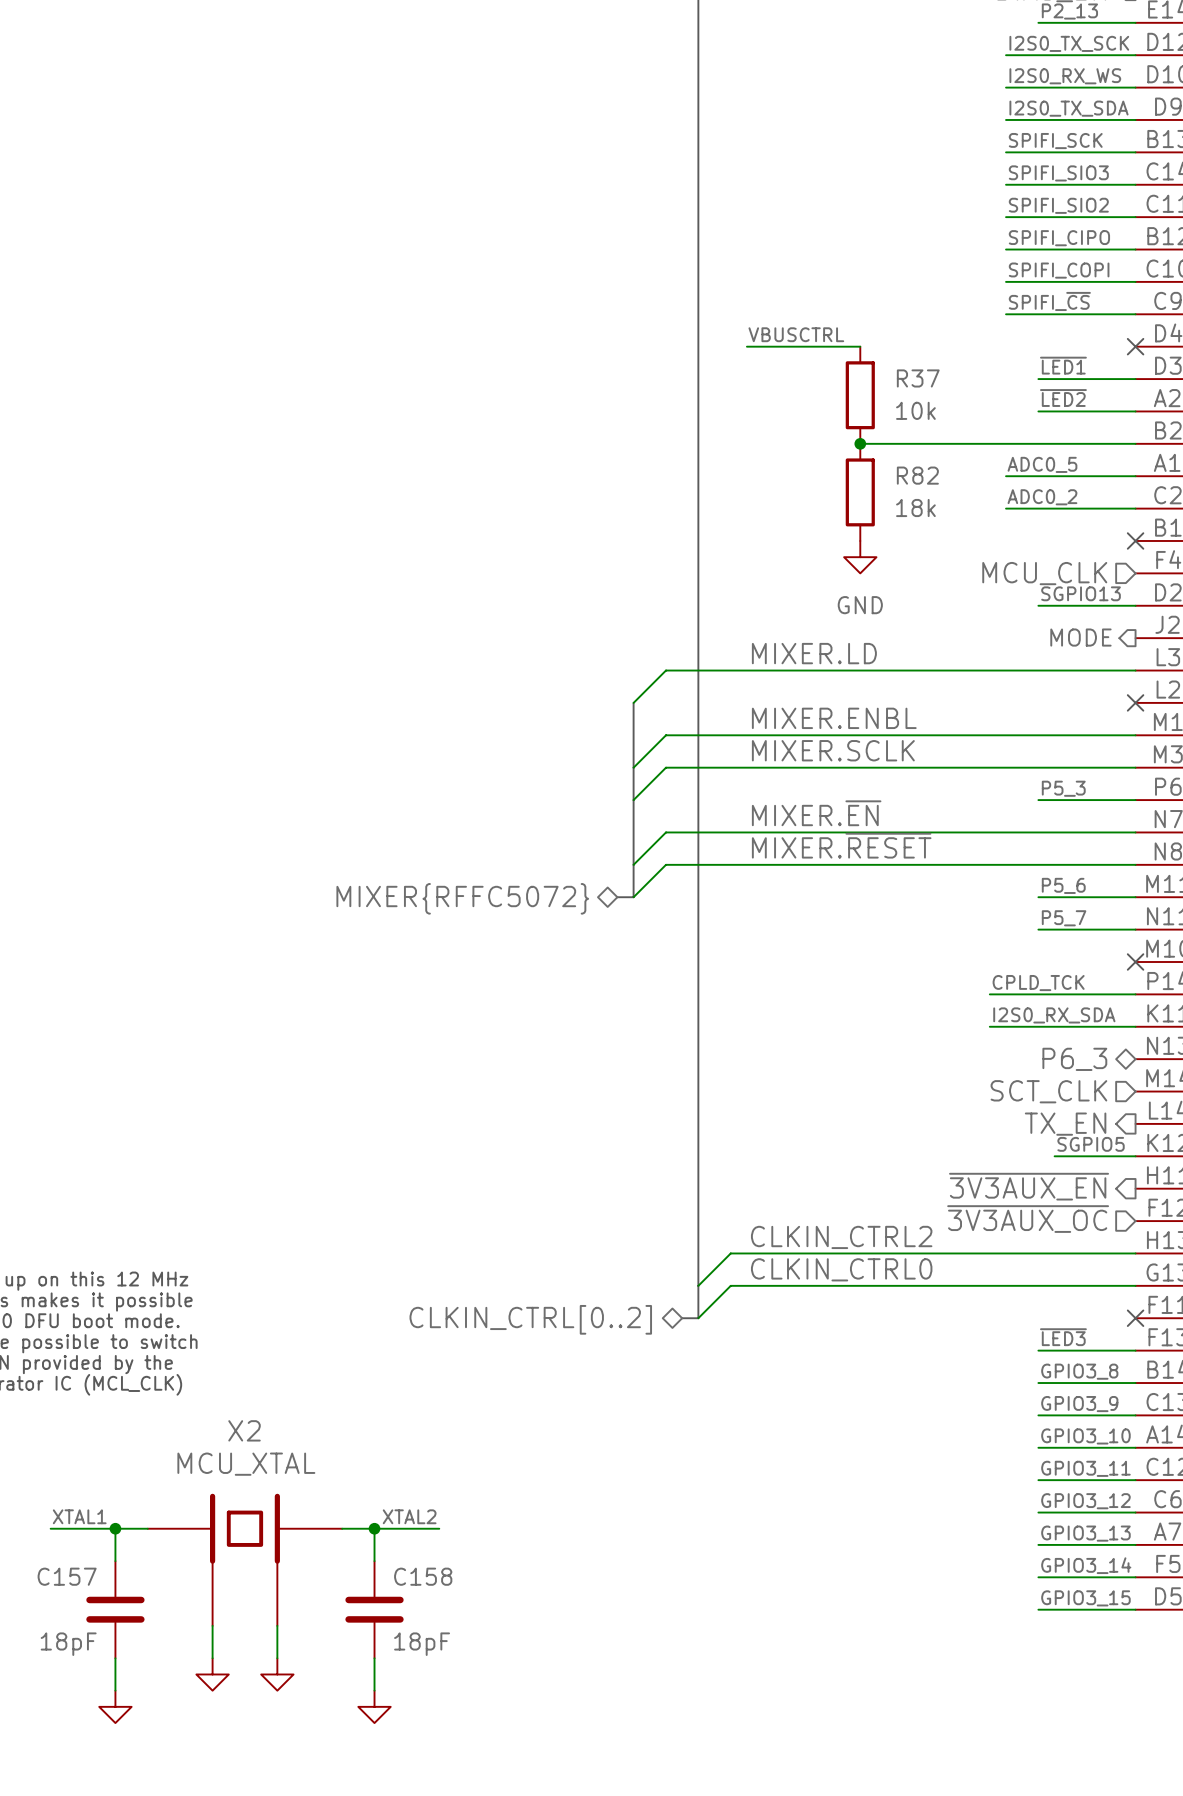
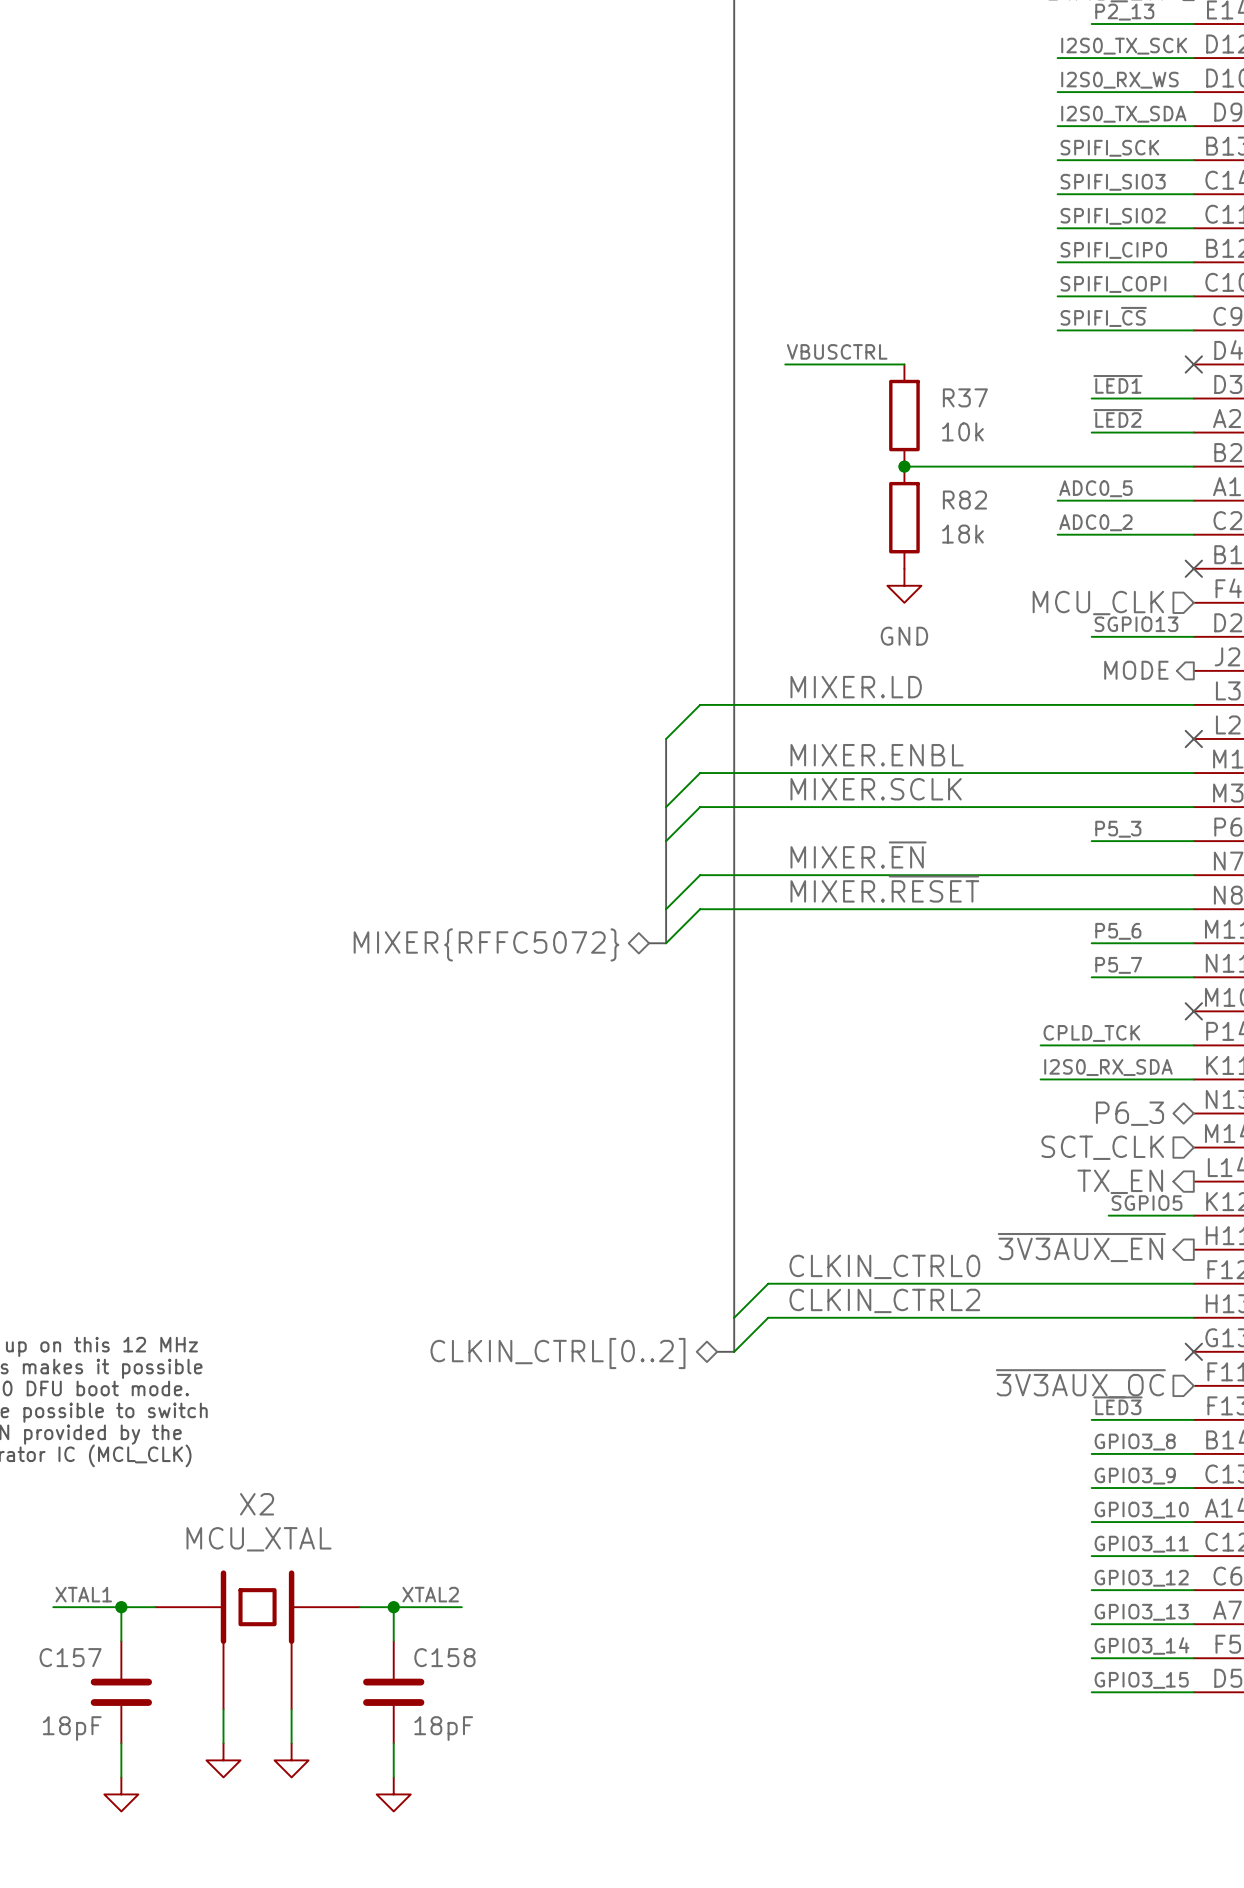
hierarchical label position: ~{3V3AUX_OC} (1028, 1219) -> ~{3V3AUX_OC} (1080, 1383)
label position: CLKIN_CTRL0 (841, 1269) -> CLKIN_CTRL0 (884, 1266)
bus: (698, 1285) (698, 1318) (682, 1318) -> (734, 1351) (717, 1351)
wire: (1135, 1285) (730, 1285) (698, 1318) -> (1193, 1283) (768, 1283) (734, 1317)
no-connect mark position: (1135, 1318) -> (1193, 1351)
hierarchical label position: CLKIN_CTRL[0..2] (530, 1319) -> CLKIN_CTRL[0..2] (558, 1353)

